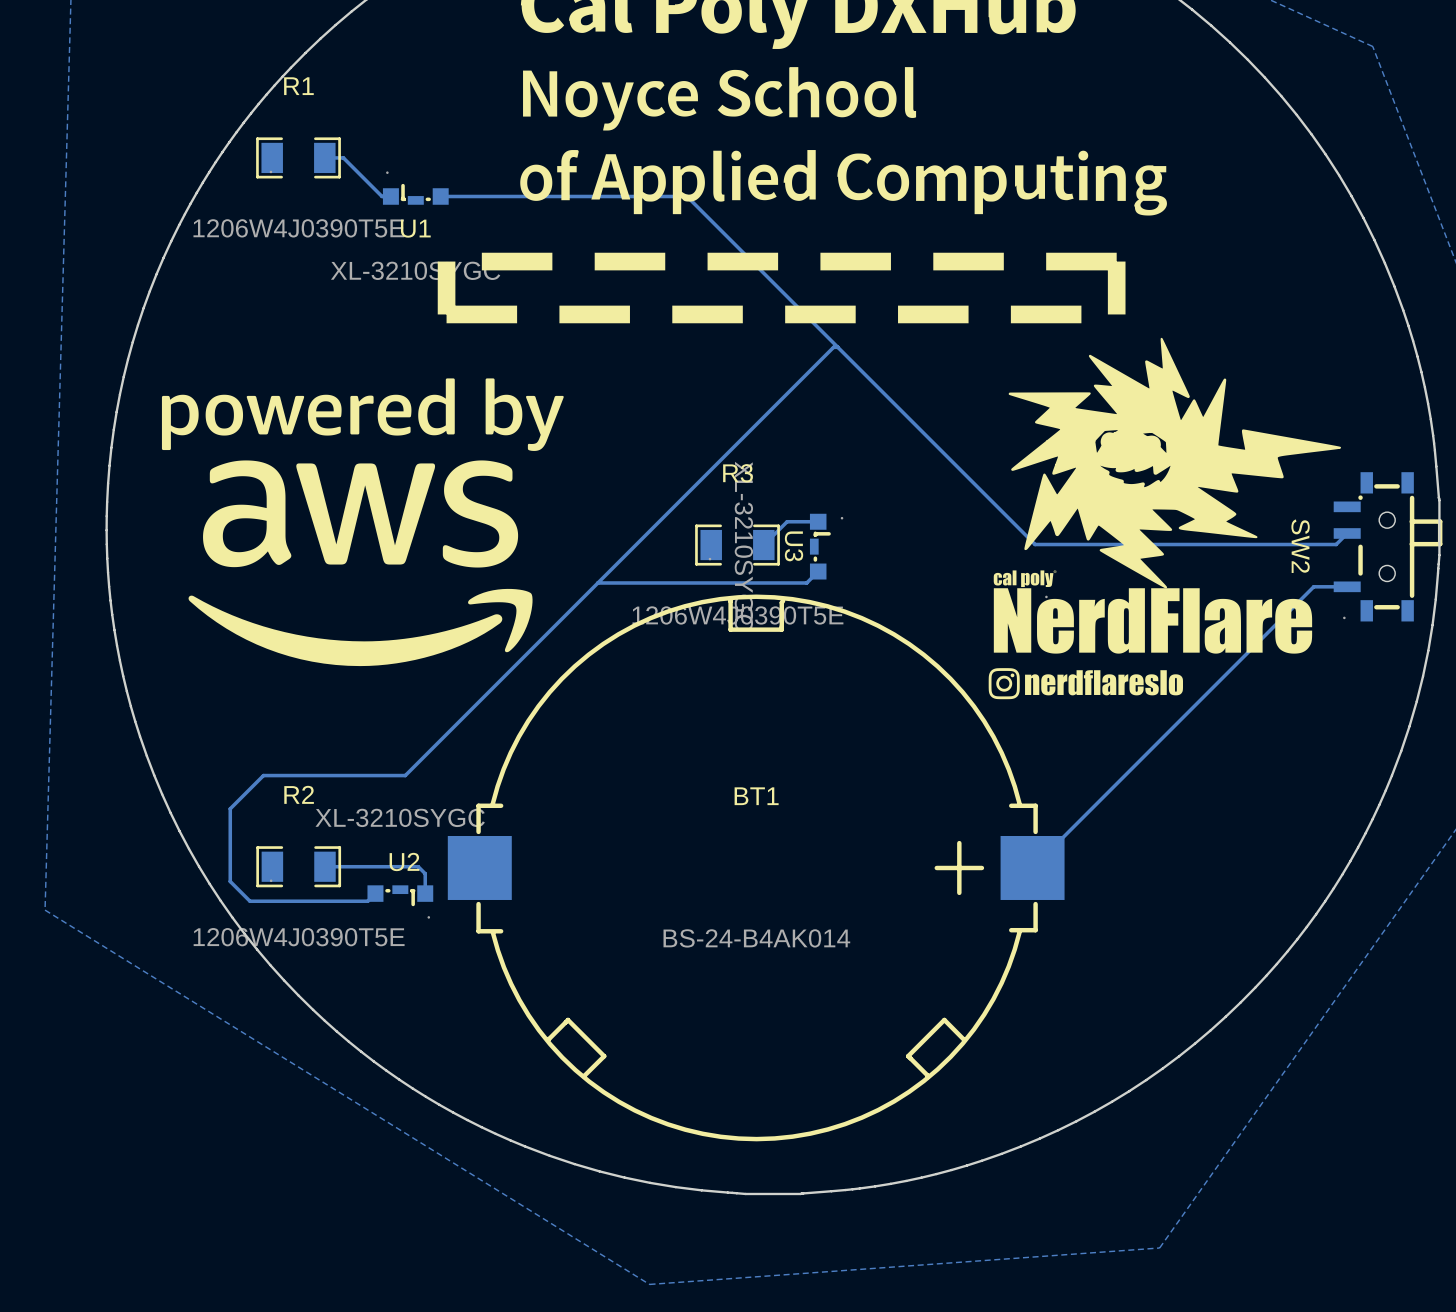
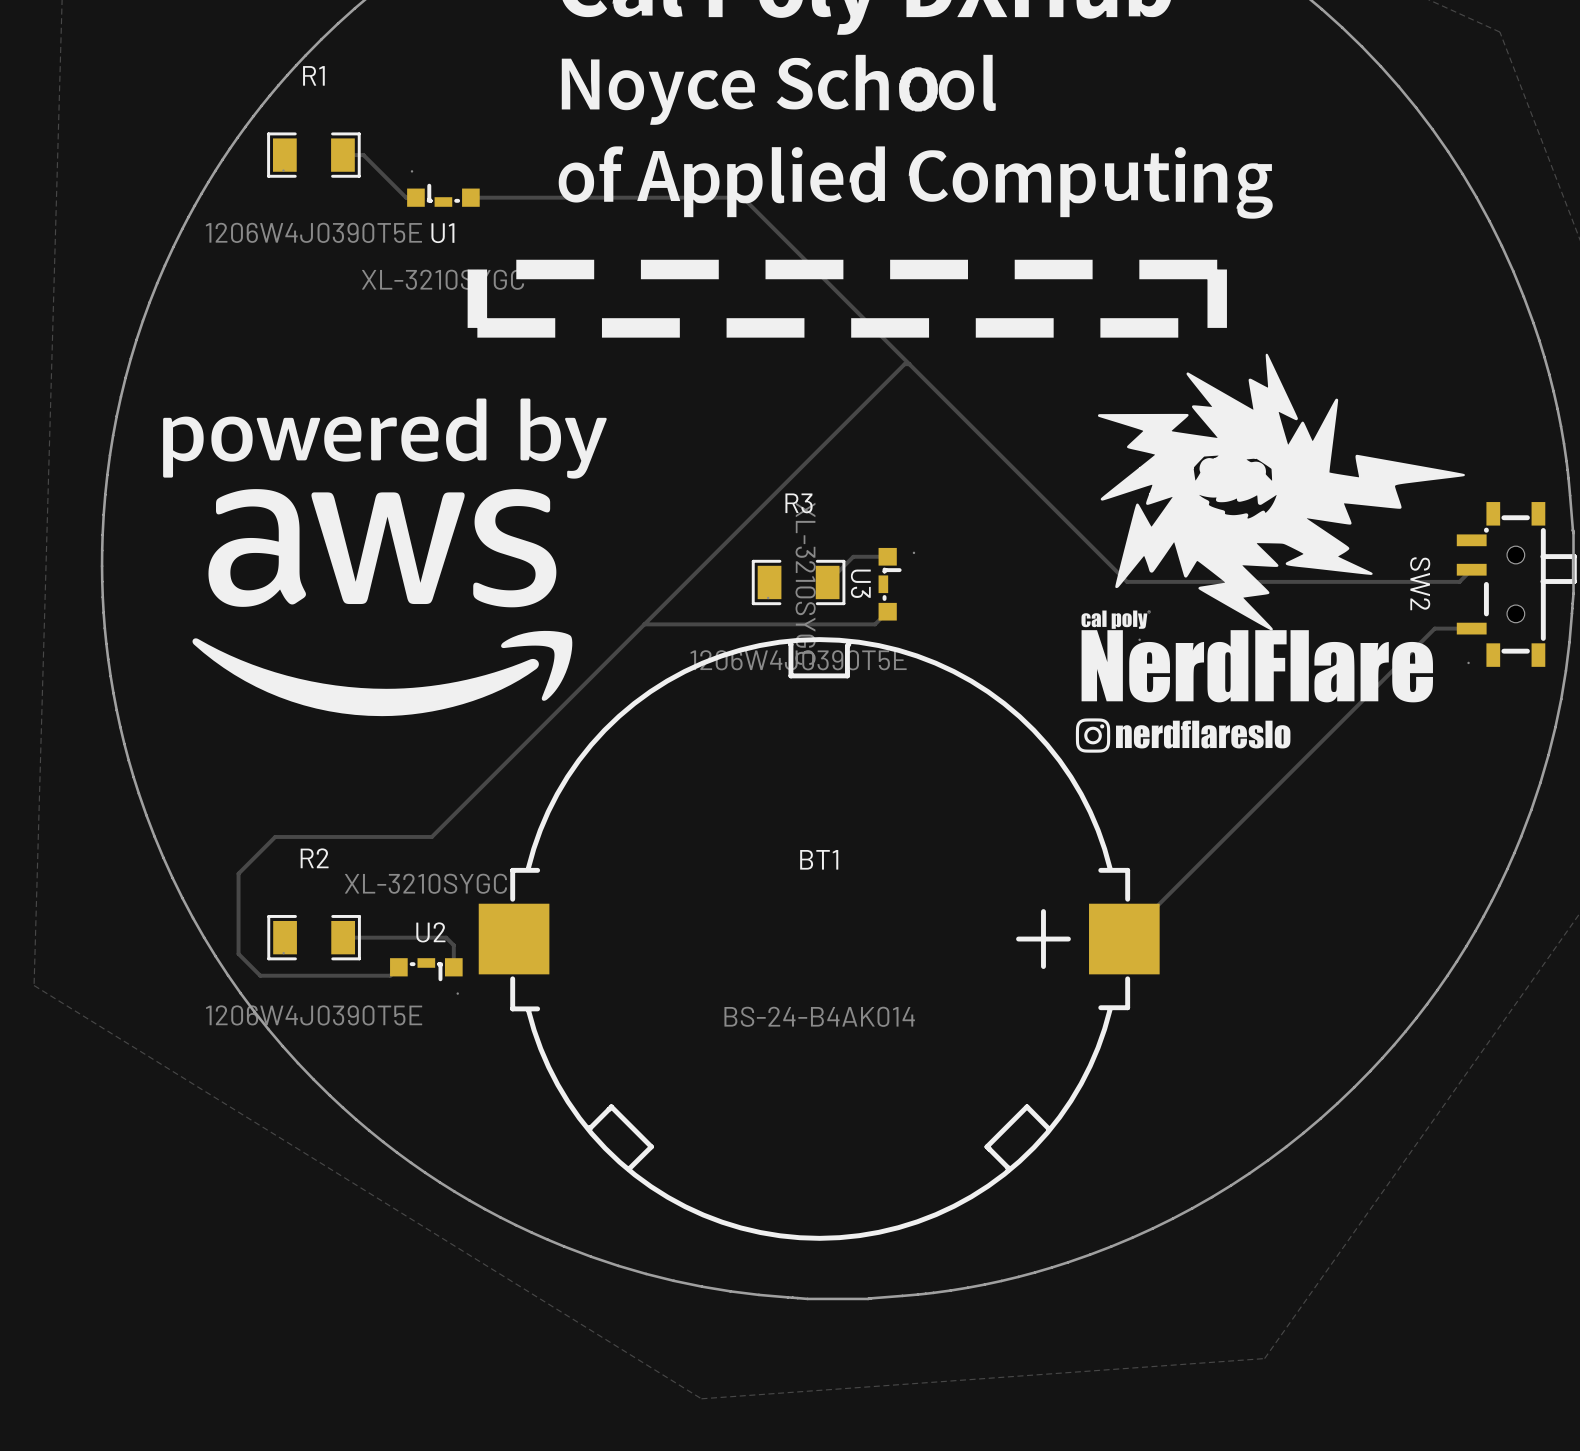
drawing shape: [826, 81, 859, 118] -> [899, 67, 938, 112]

